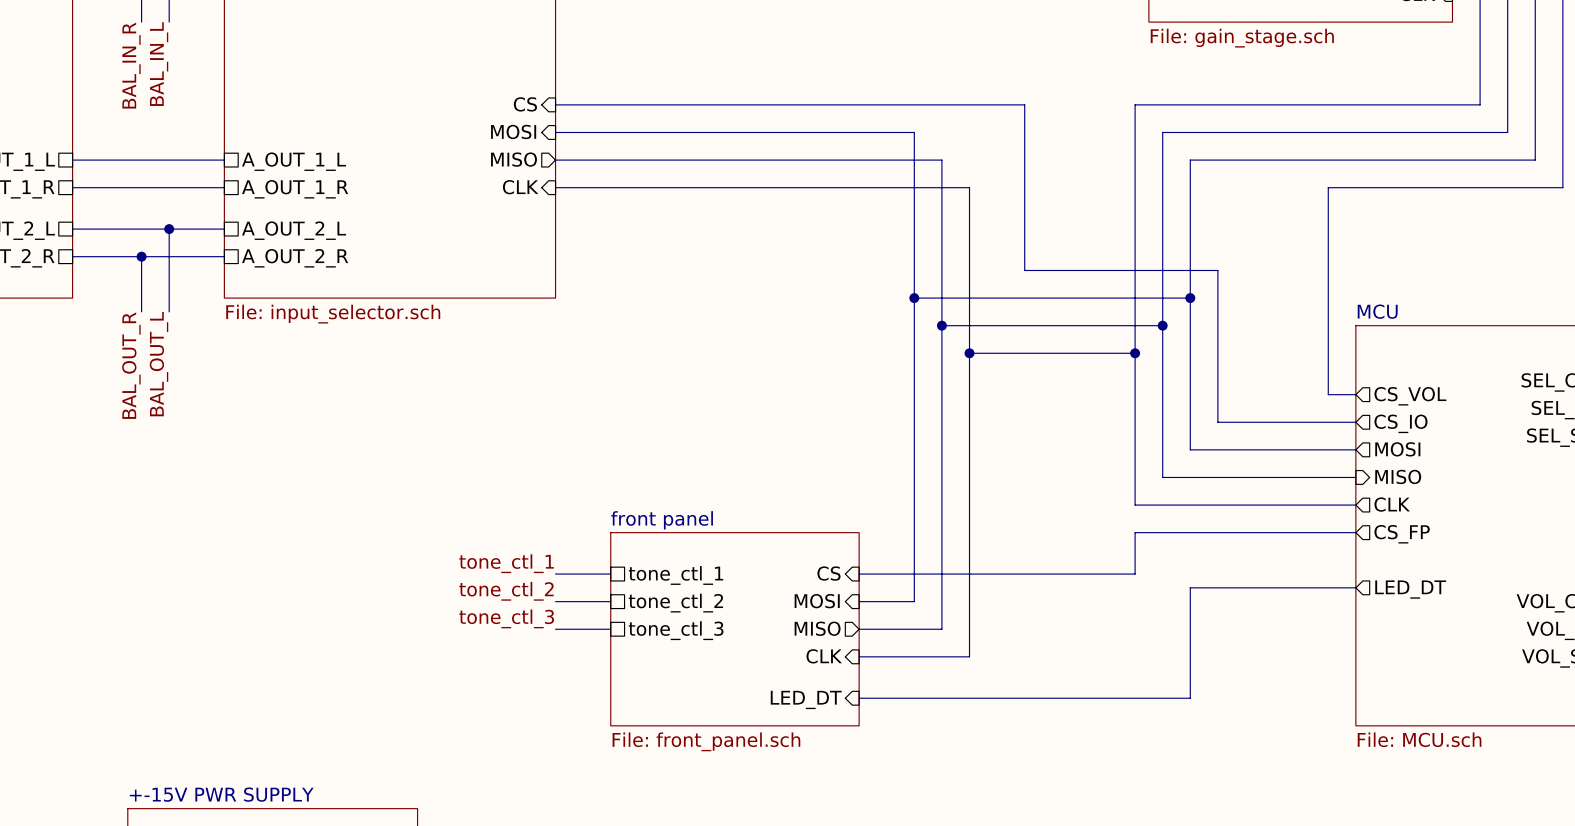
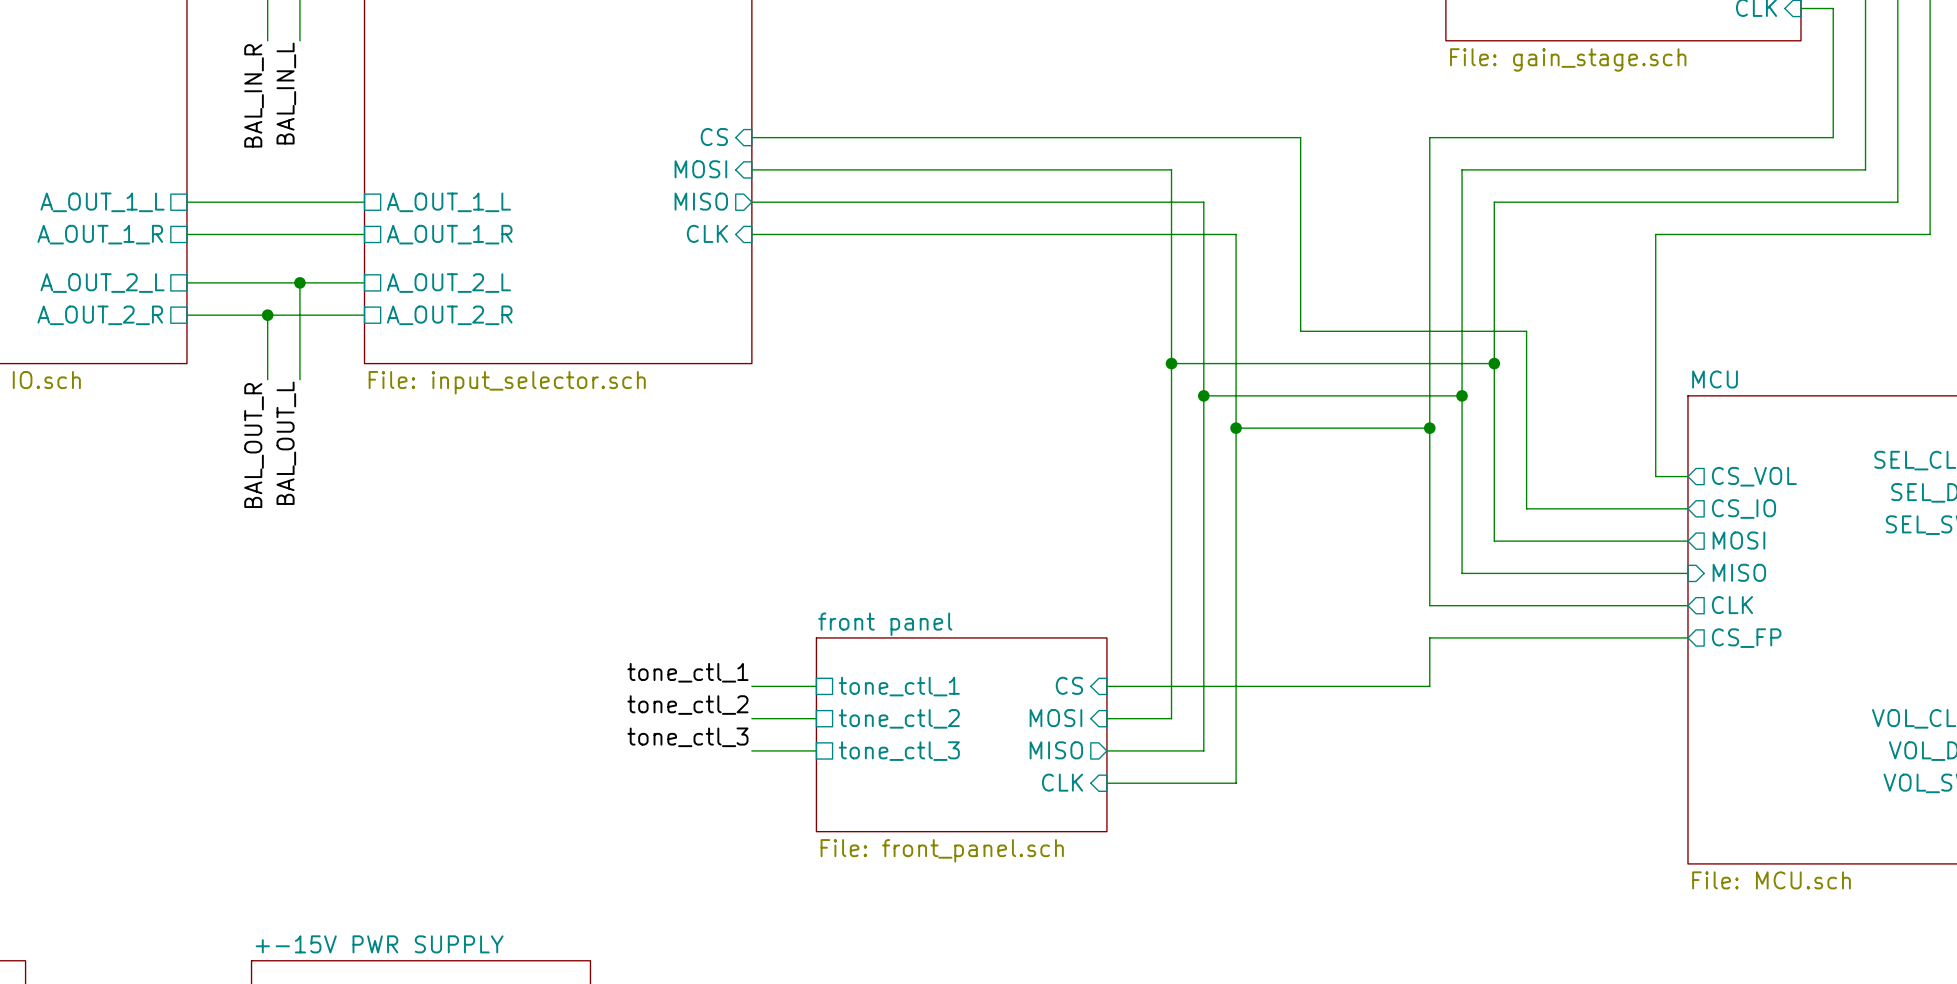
wire: (1355, 587) (1190, 587) (1190, 698) (859, 698) -> none
sheet pin: LED_DT (1410, 589) -> none
sheet front panel: none -> File: front_panel.sch (961, 734)
sheet front panel: File: front_panel.sch (734, 629) -> none
sheet pin: LED_DT (806, 699) -> none

